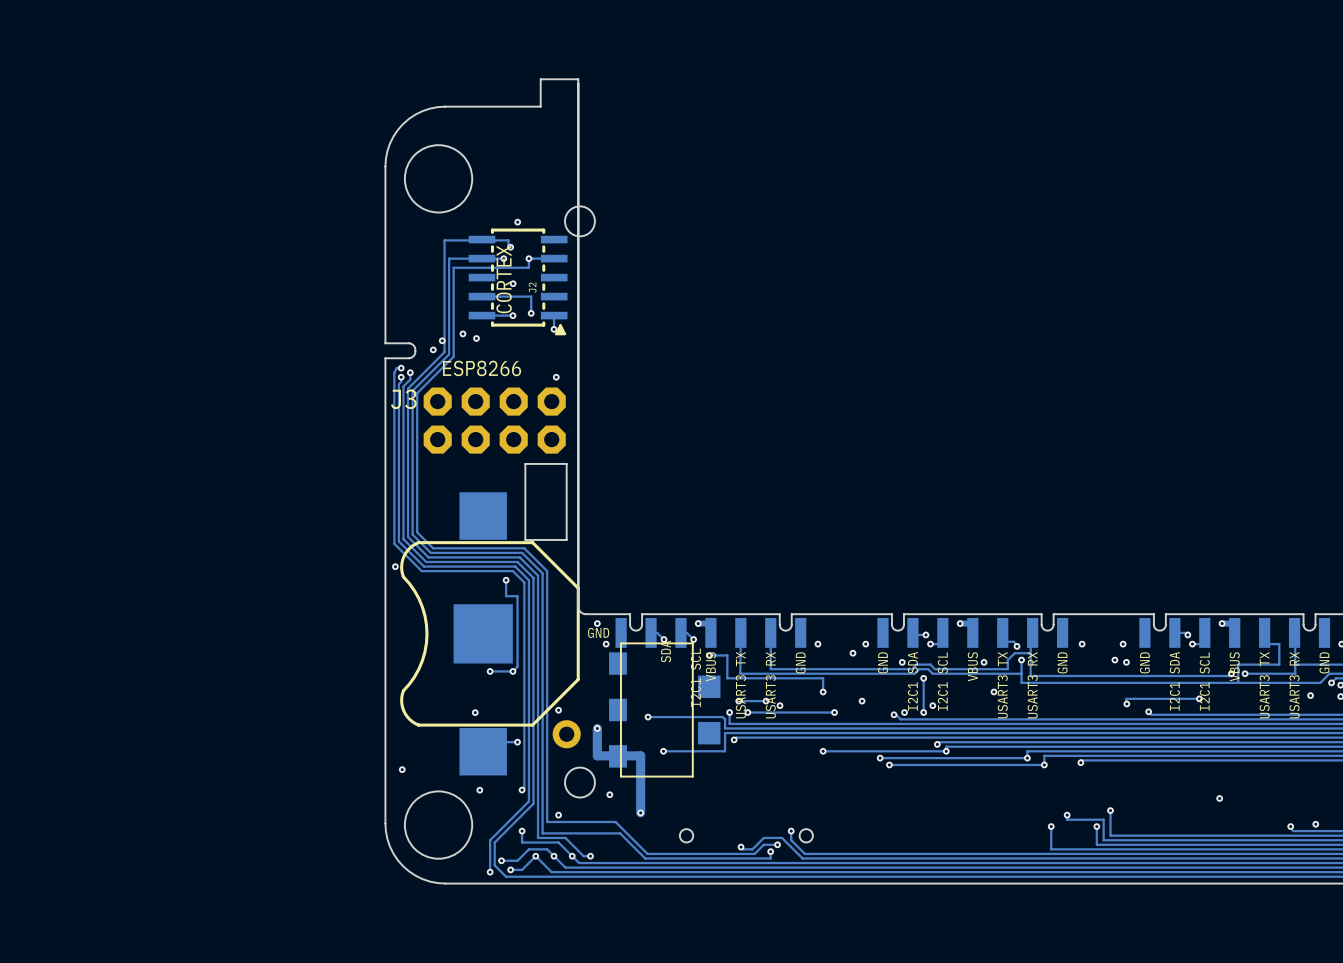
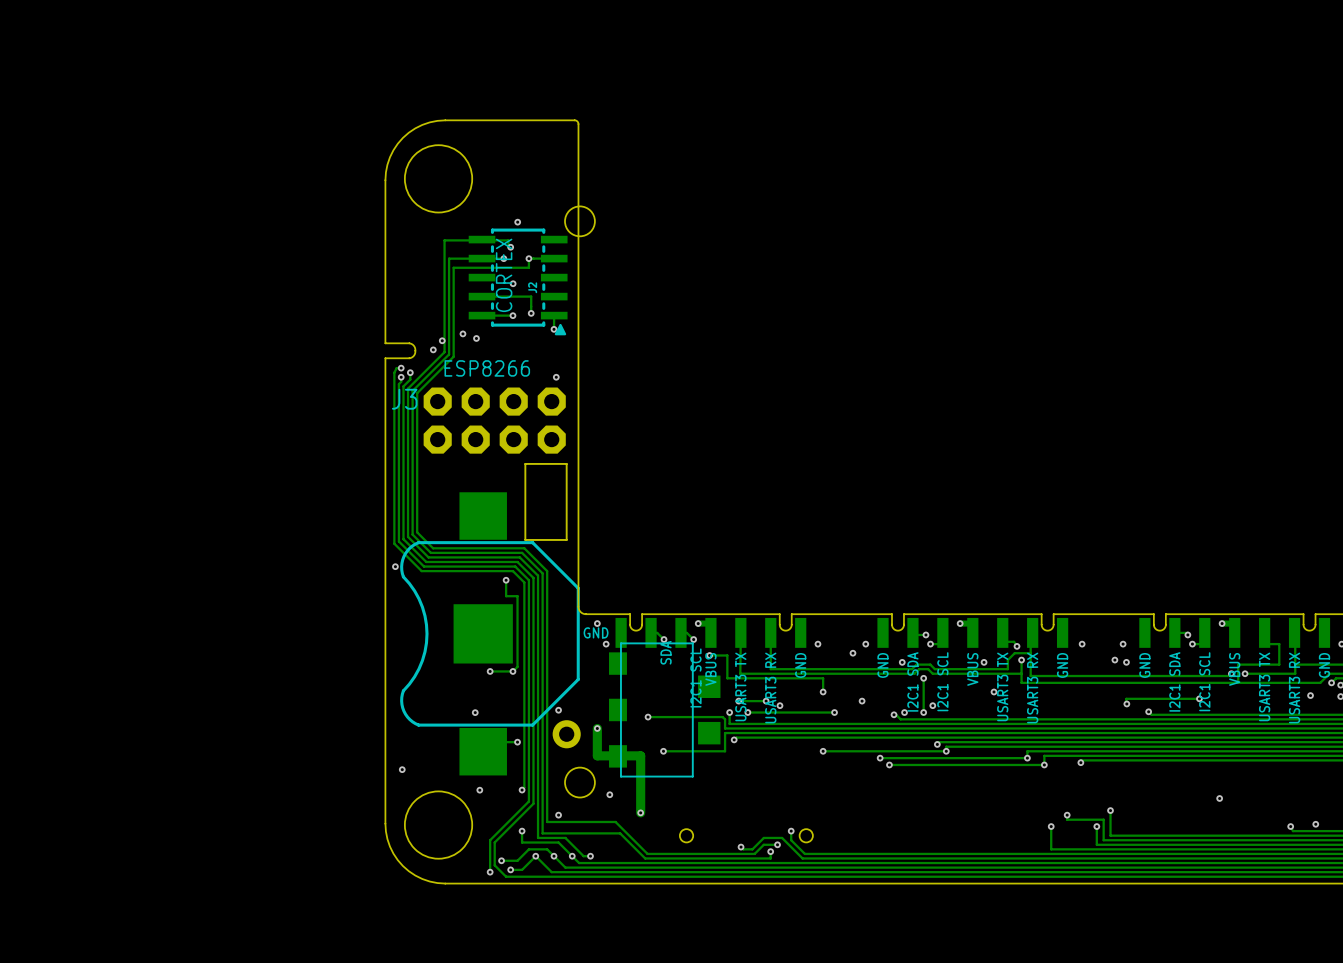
board edge: (445, 106) (429, 108) (415, 114) (397, 130) (387, 151) (385, 180) -> (578, 124) (574, 120) (445, 120) (429, 122) (415, 128) (397, 143) (387, 164) (385, 180)
board edge: (445, 106) (540, 106) (540, 79) (578, 79) (578, 606) -> none

